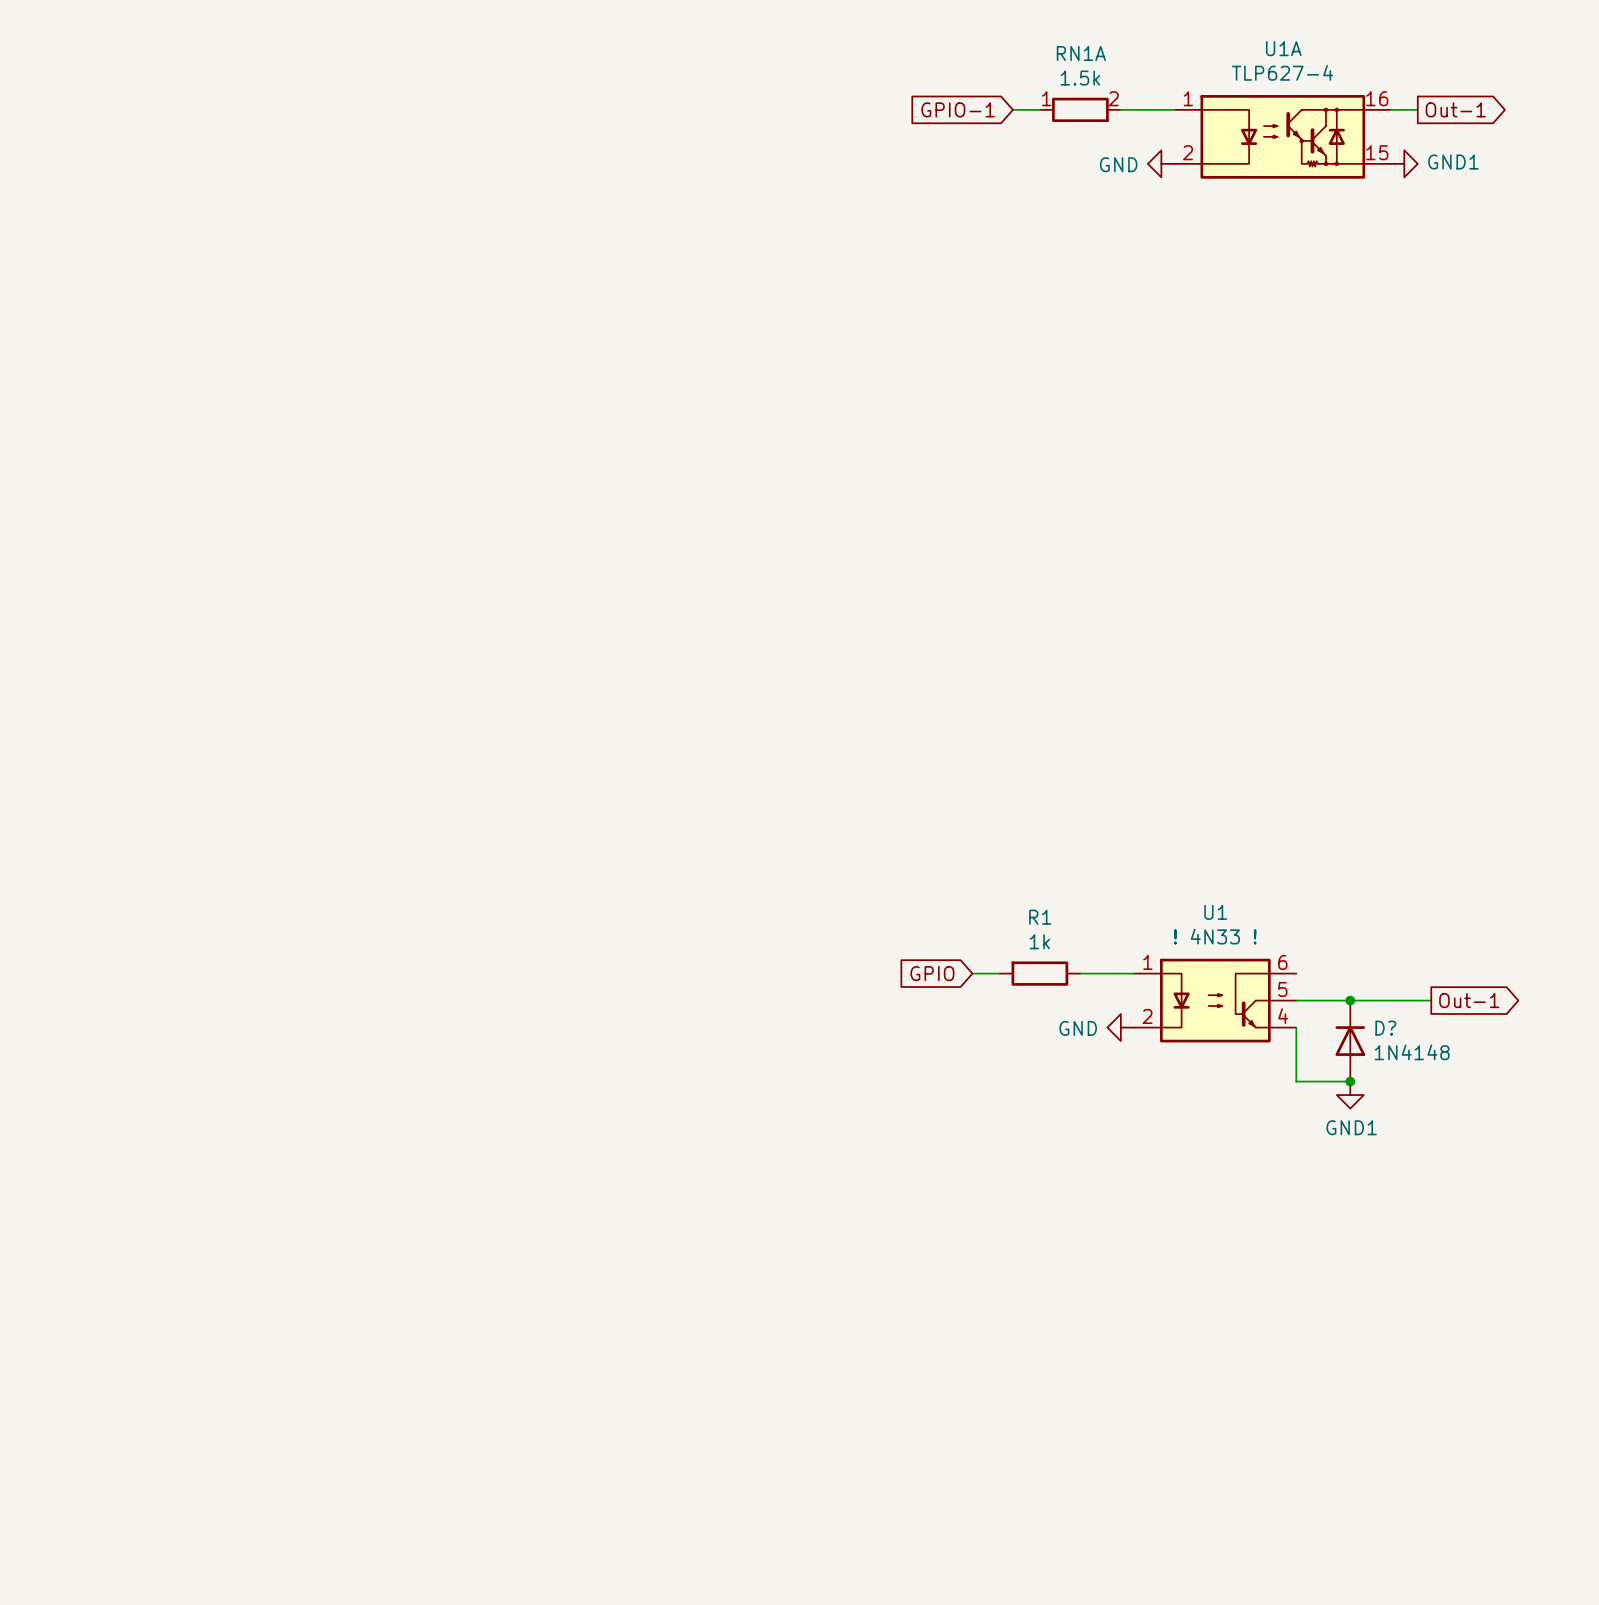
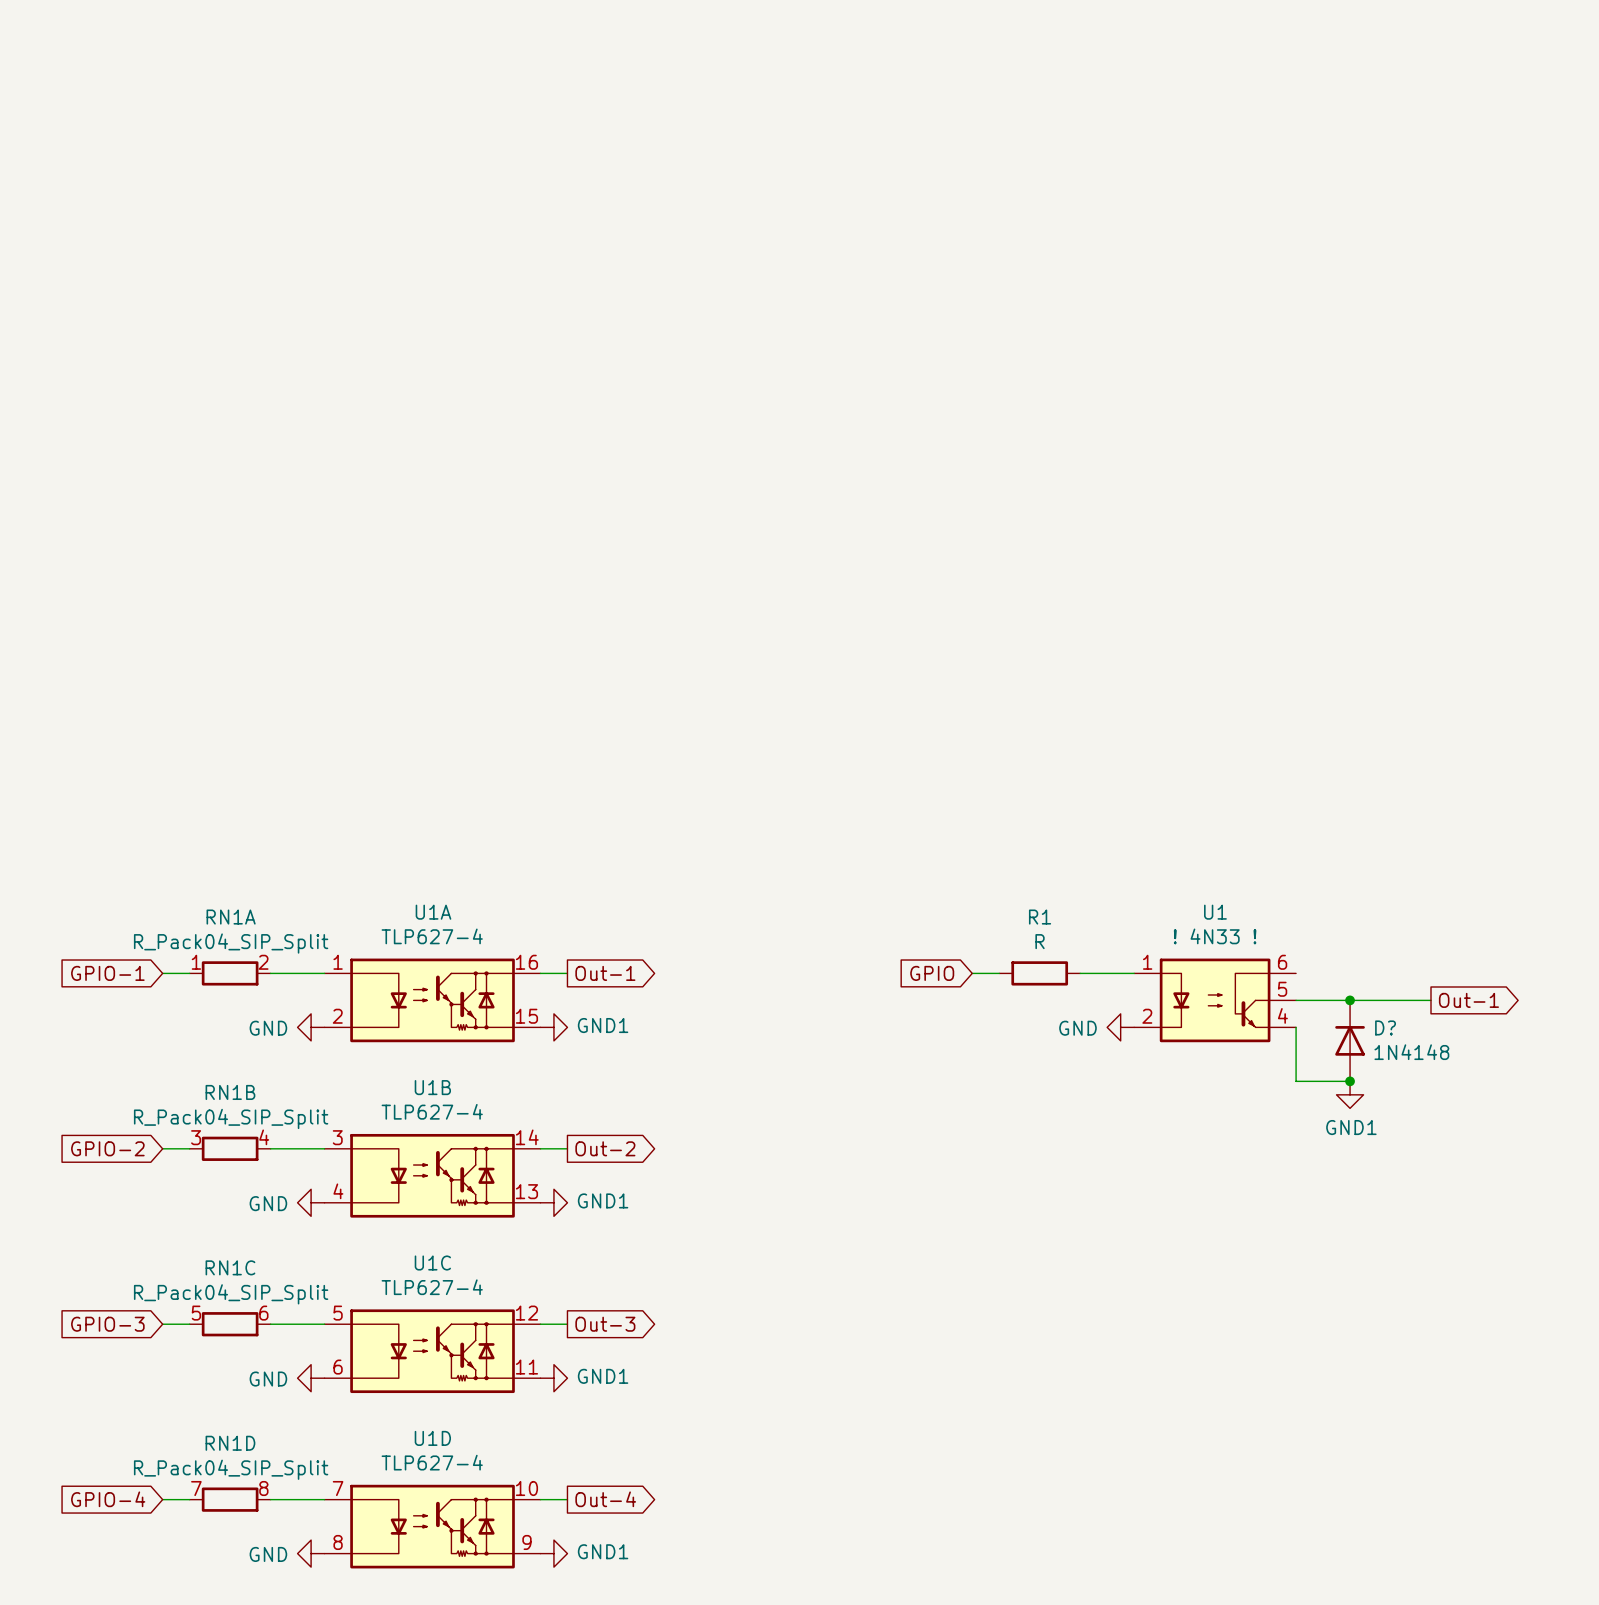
RN1A value: 1.5k (1080, 78) -> R_Pack04_SIP_Split (231, 943)
global label: GPIO-1 (958, 109) -> none
wire: (1012, 109) (1039, 109) -> none
RN1A position: (1080, 109) -> (230, 973)
wire: (1120, 109) (1174, 109) -> none
wire: (1390, 109) (1417, 109) -> none
global label: Out-1 (1455, 109) -> none
U1A position: (1282, 136) -> (432, 1000)
power symbol: GND (1161, 163) -> none
power symbol: GND1 (1404, 163) -> none
R1 value: 1k (1039, 941) -> R (1040, 941)
global label: none -> GPIO-1 (107, 973)
wire: none -> (162, 973) (189, 973)
wire: none -> (270, 973) (324, 973)
wire: none -> (540, 973) (567, 973)
global label: none -> Out-1 (605, 973)
power symbol: none -> GND (311, 1027)
power symbol: none -> GND1 (553, 1027)
global label: none -> GPIO-2 (107, 1148)
wire: none -> (162, 1148) (189, 1148)
RN1B: none -> R_Pack04_SIP_Split (230, 1148)
wire: none -> (270, 1148) (324, 1148)
wire: none -> (540, 1148) (567, 1148)
global label: none -> Out-2 (605, 1148)
U1B: none -> TLP627-4 (432, 1175)
power symbol: none -> GND (311, 1202)
power symbol: none -> GND1 (553, 1202)
global label: none -> GPIO-3 (107, 1324)
wire: none -> (162, 1324) (189, 1324)
RN1C: none -> R_Pack04_SIP_Split (230, 1324)
wire: none -> (270, 1324) (324, 1324)
wire: none -> (540, 1324) (567, 1324)
global label: none -> Out-3 (605, 1324)
U1C: none -> TLP627-4 (432, 1351)
power symbol: none -> GND (311, 1378)
power symbol: none -> GND1 (553, 1378)
global label: none -> GPIO-4 (108, 1499)
wire: none -> (162, 1499) (189, 1499)
RN1D: none -> R_Pack04_SIP_Split (230, 1499)
wire: none -> (270, 1499) (324, 1499)
wire: none -> (540, 1499) (567, 1499)
global label: none -> Out-4 (605, 1499)
U1D: none -> TLP627-4 (432, 1526)
power symbol: none -> GND (311, 1553)
power symbol: none -> GND1 (553, 1553)

